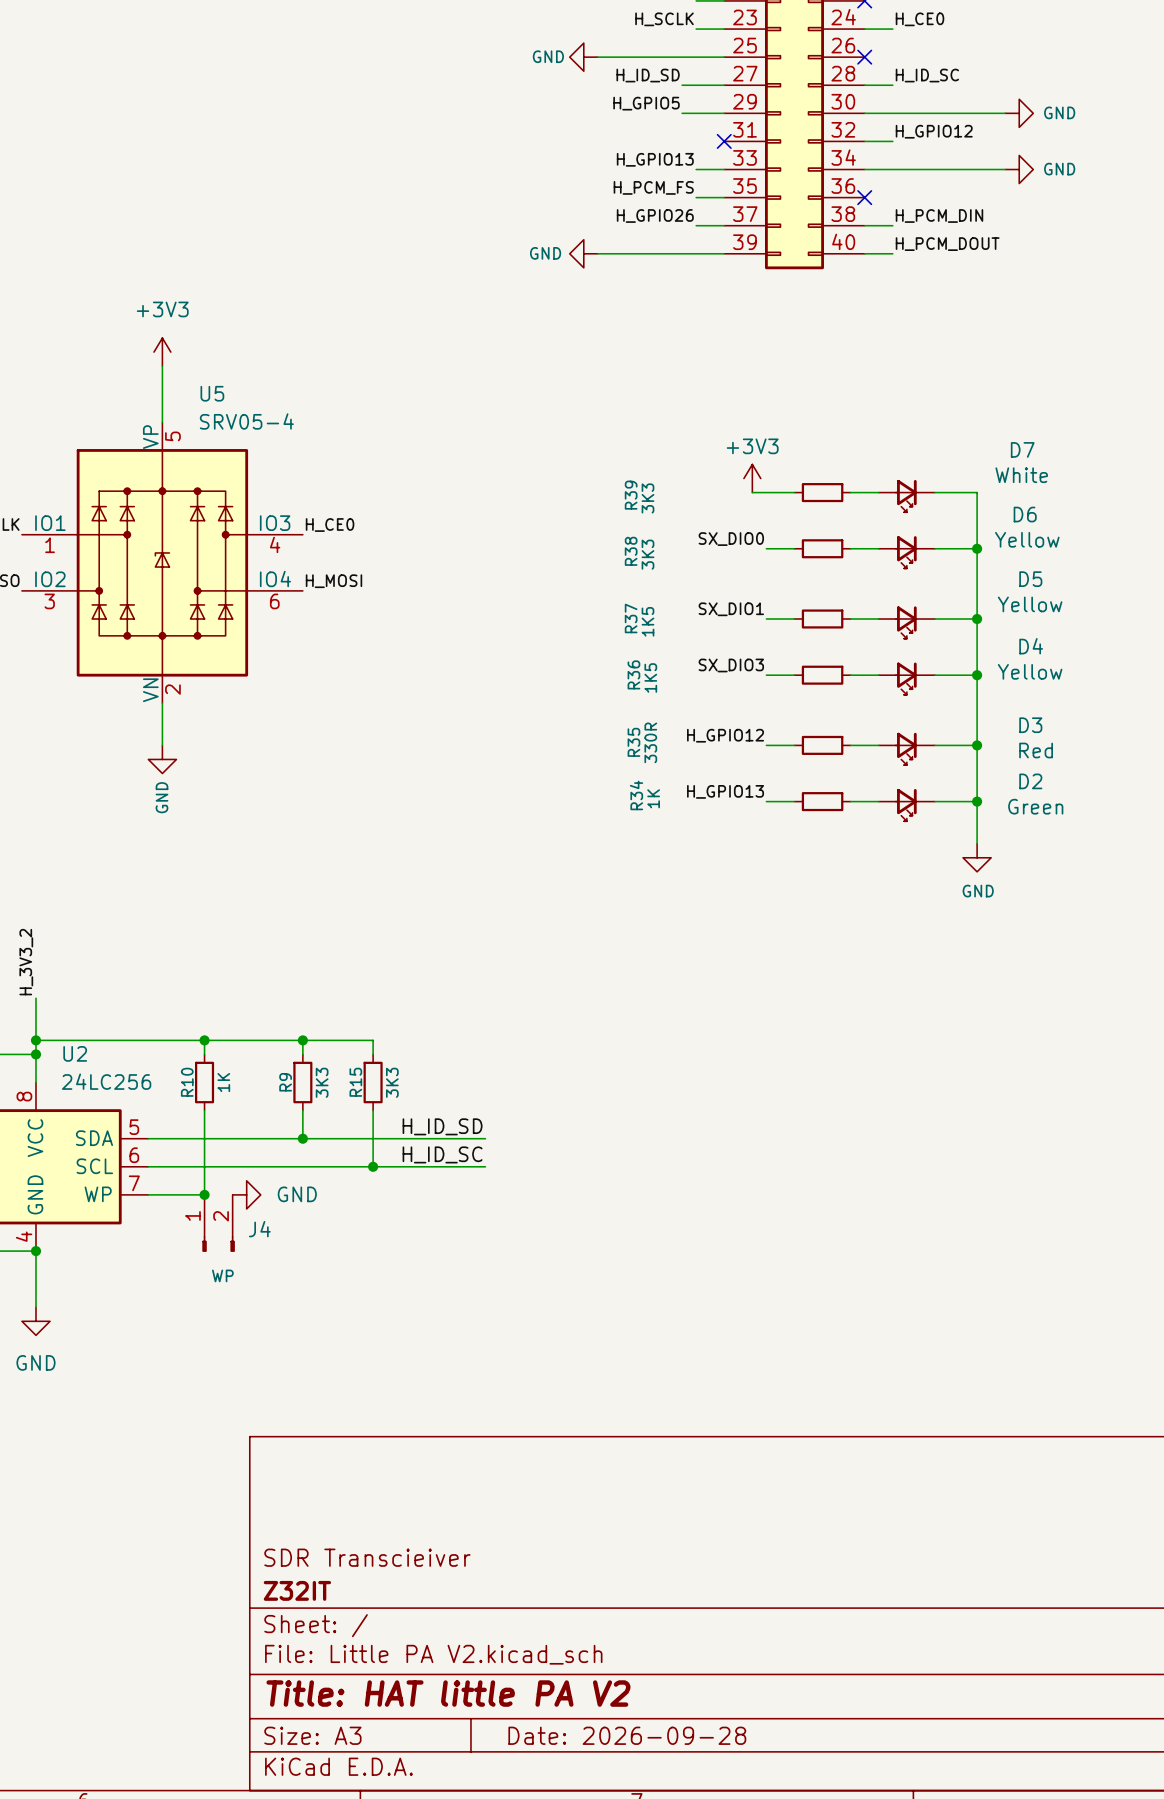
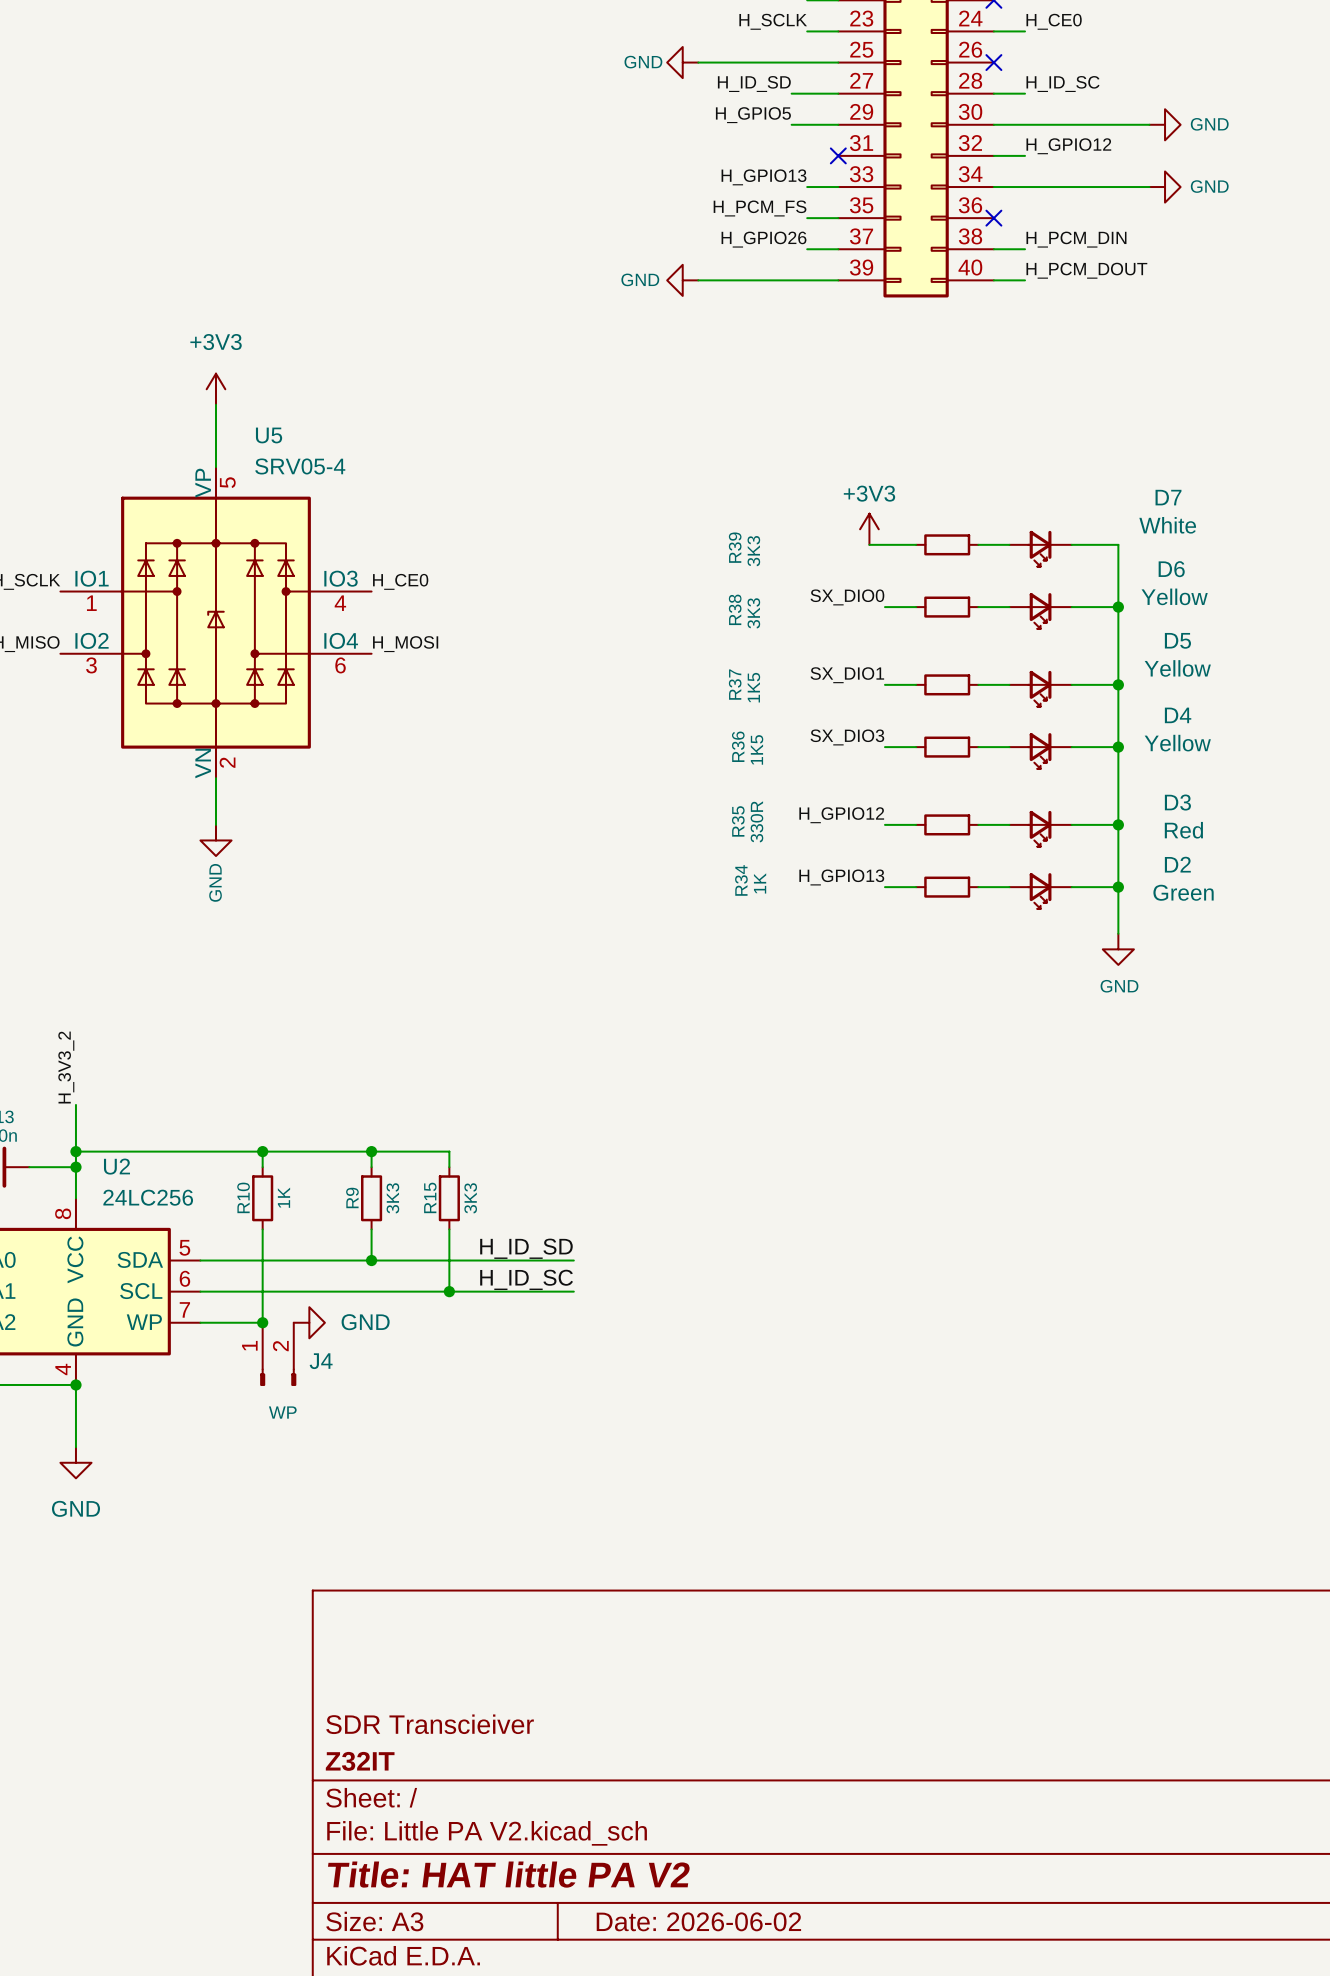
title block: Date: 2026-09-28 (627, 1735) -> Date: 2026-06-02 (698, 1921)

